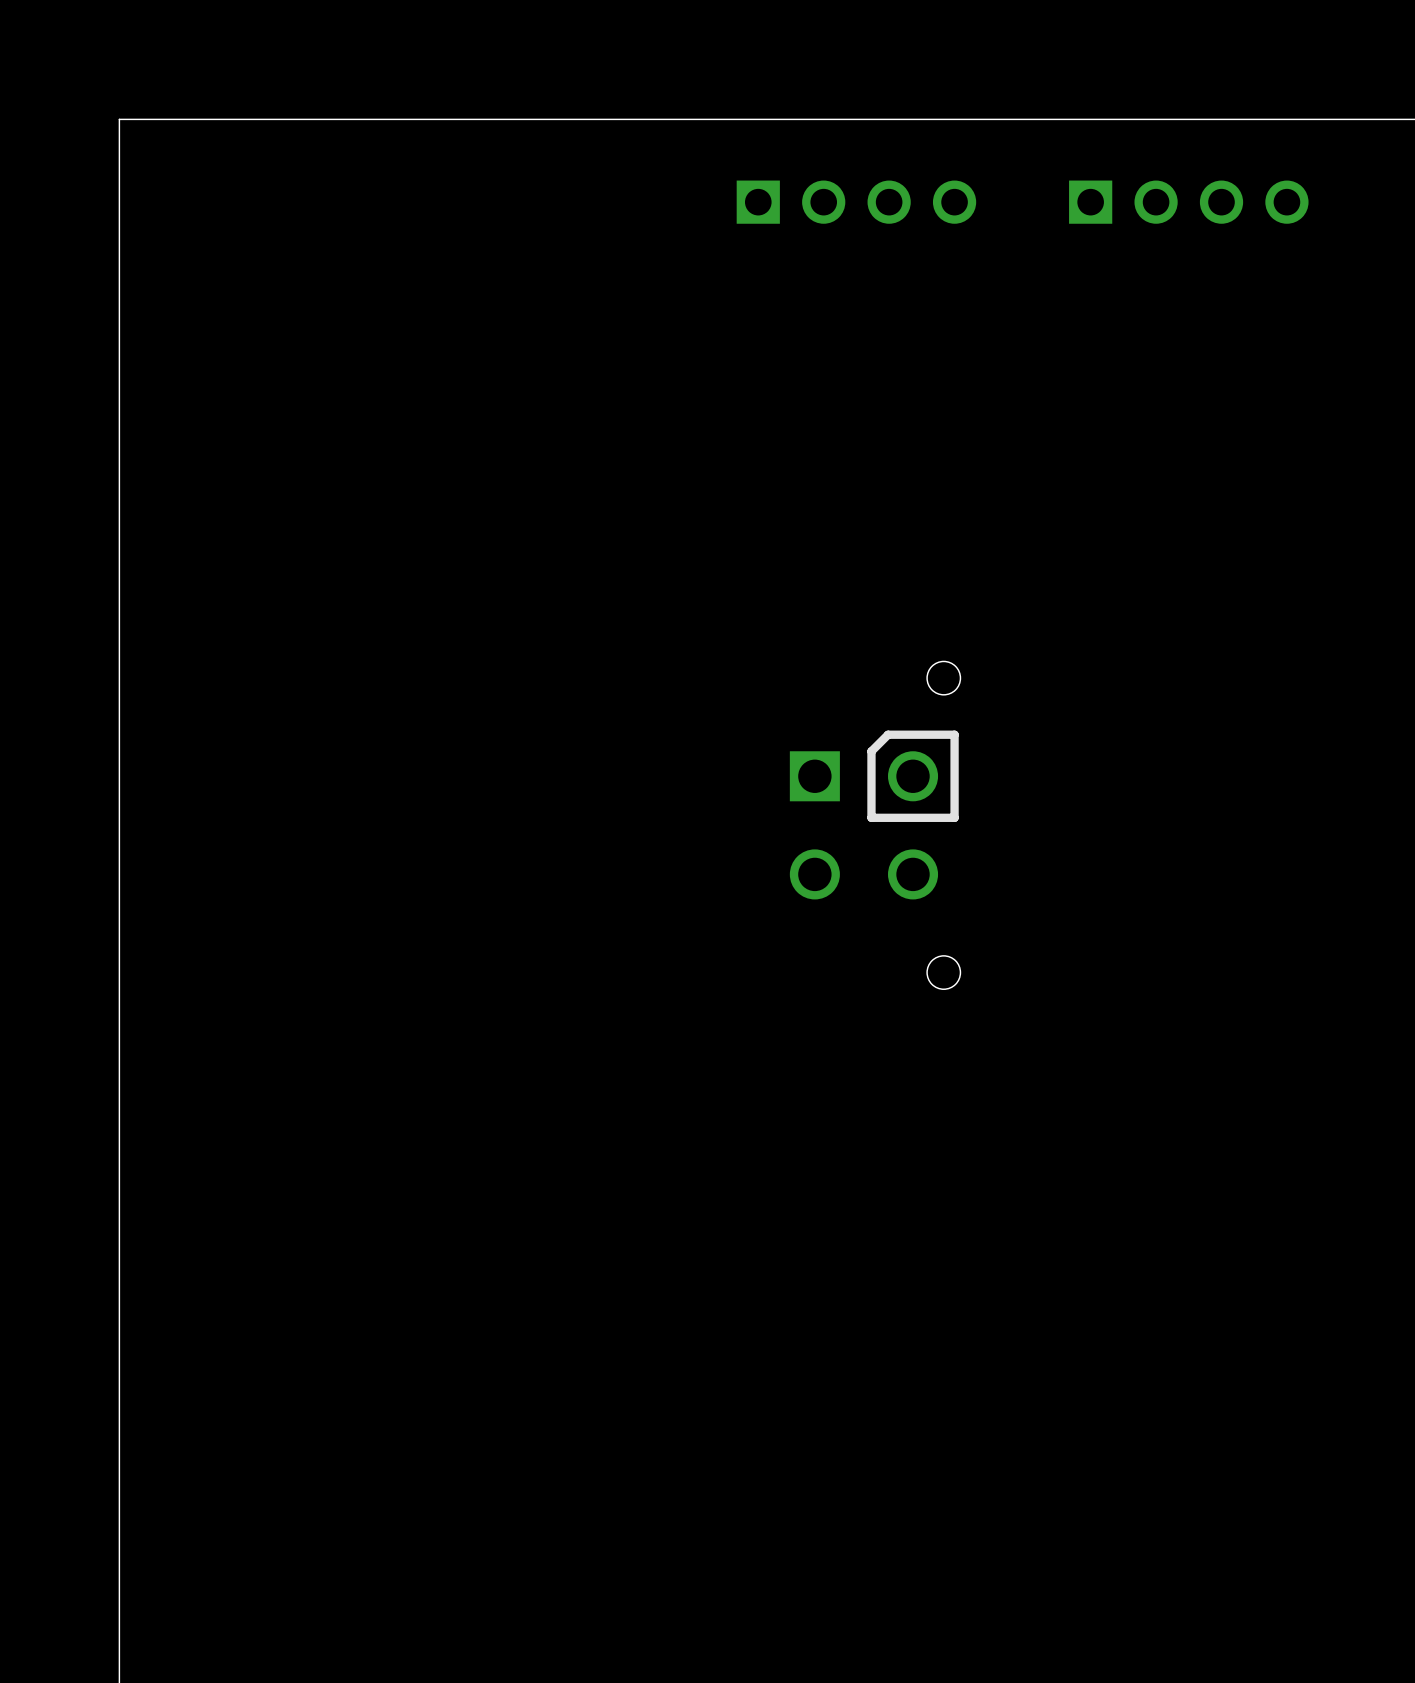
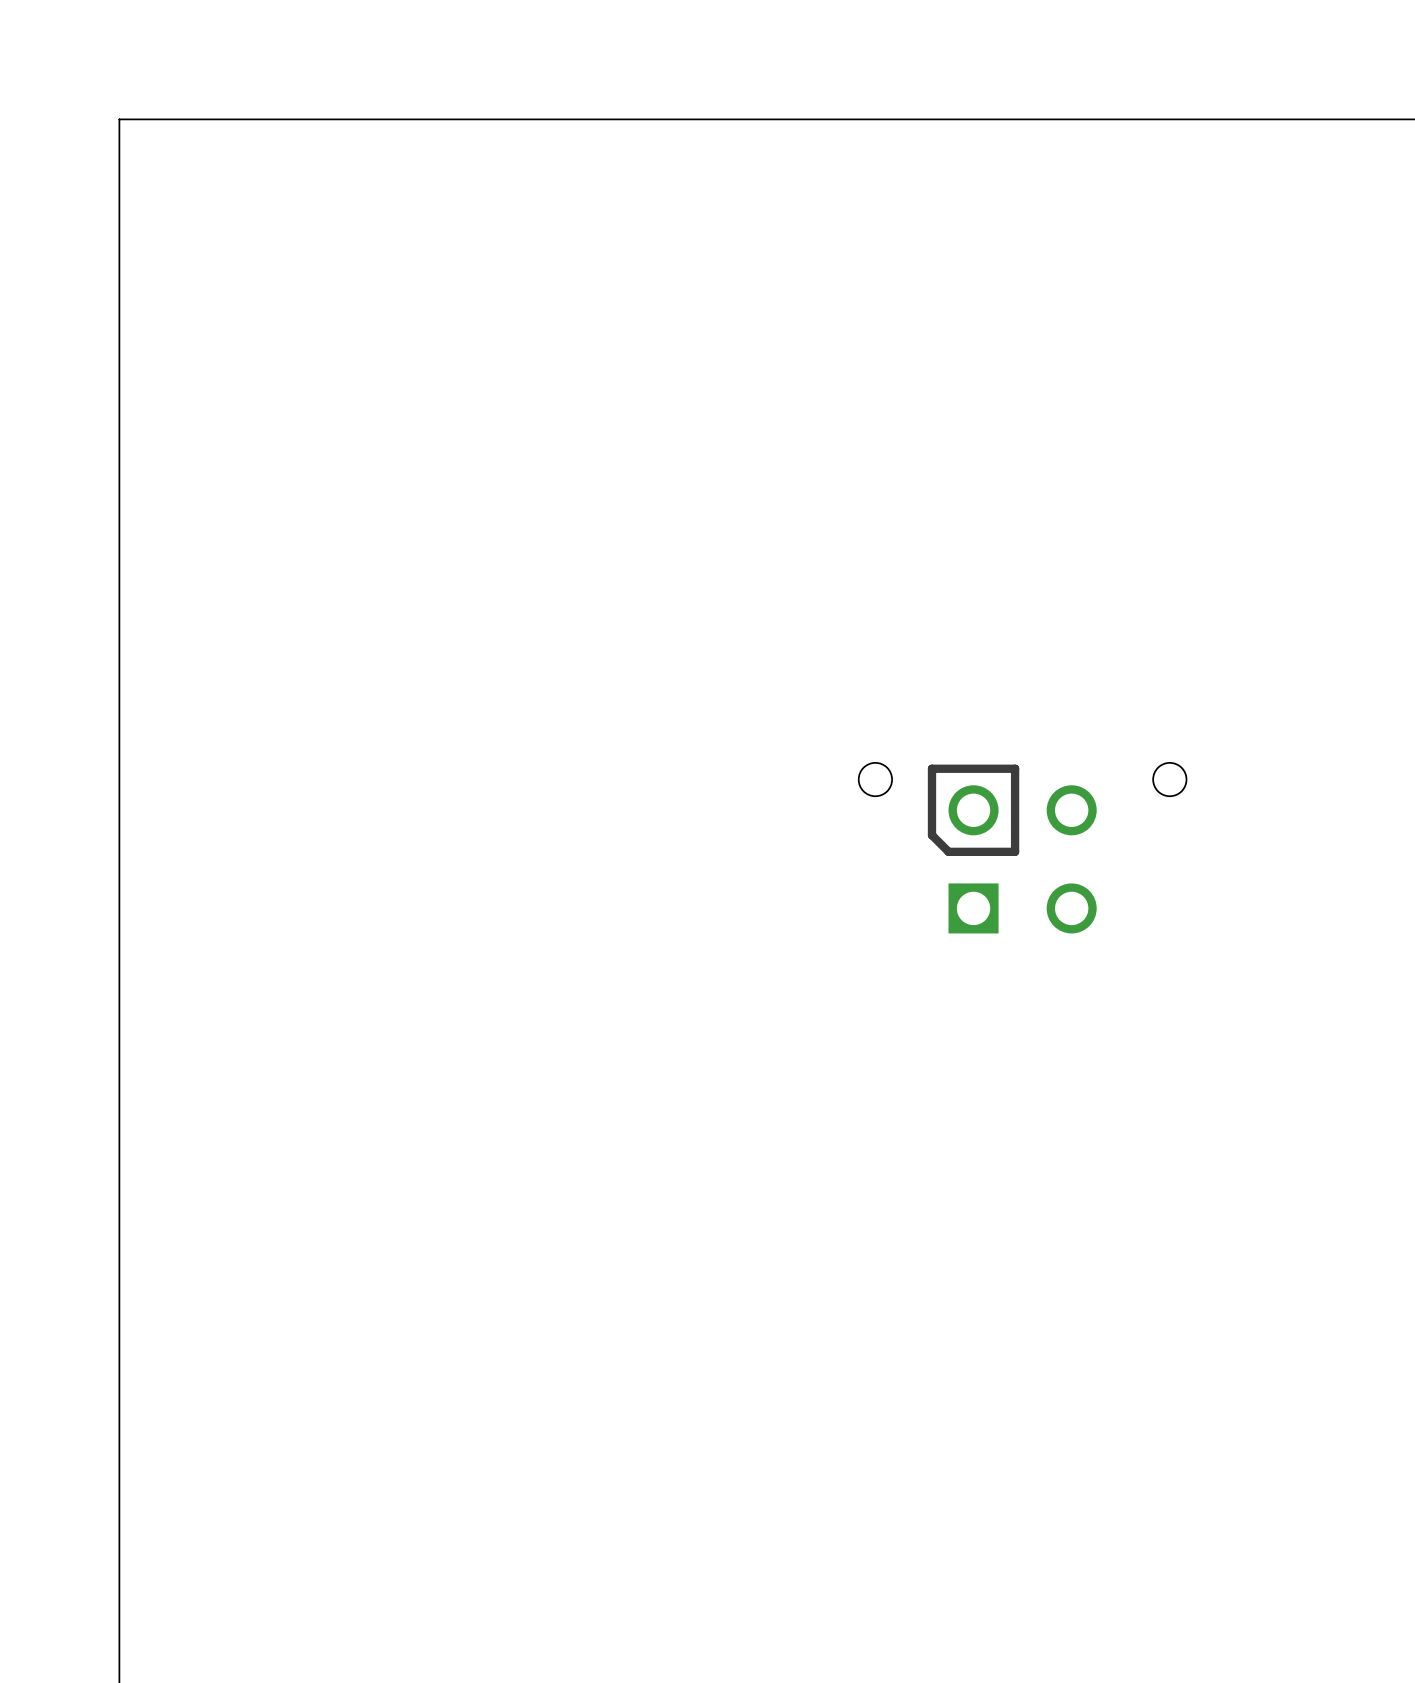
part: (856, 202) -> none
part: (1188, 202) -> none
part rotation: 0° (875, 825) -> 90° counterclockwise (1022, 848)

